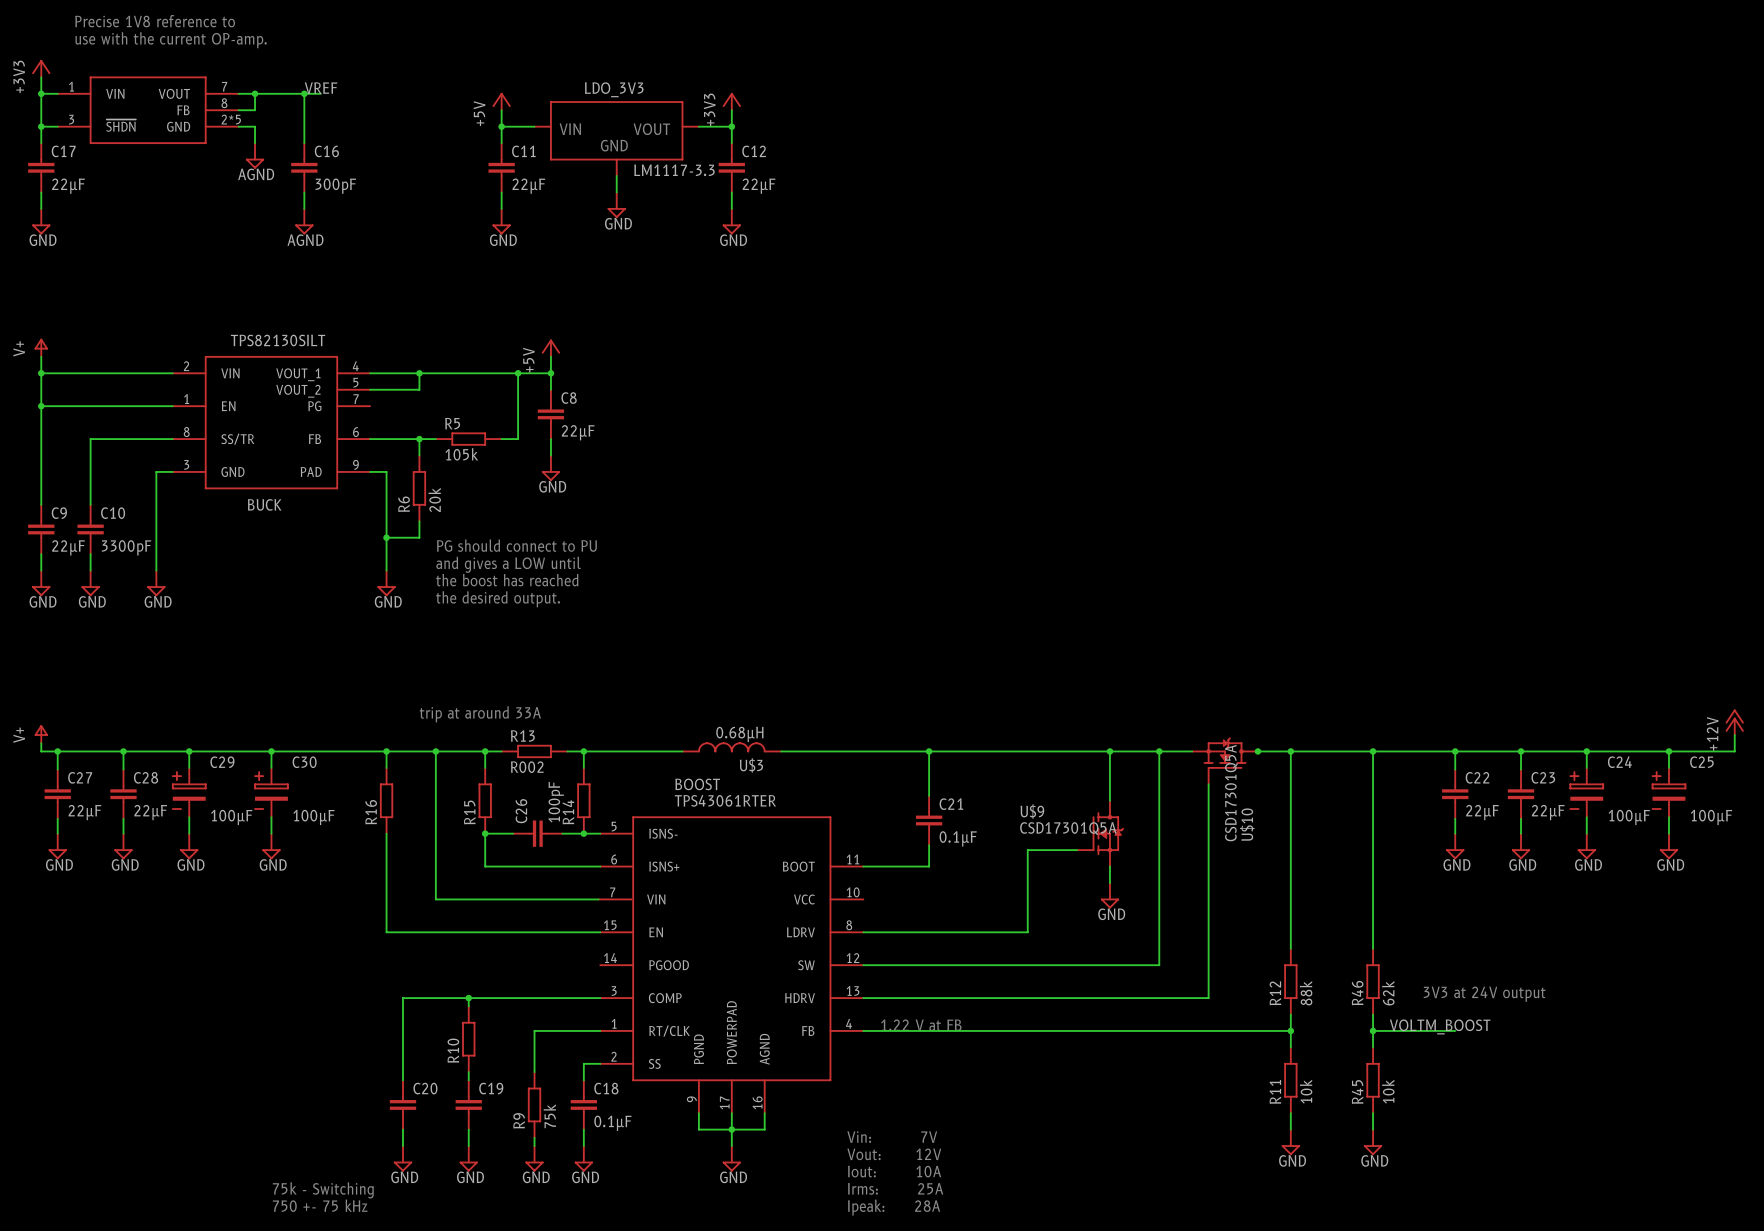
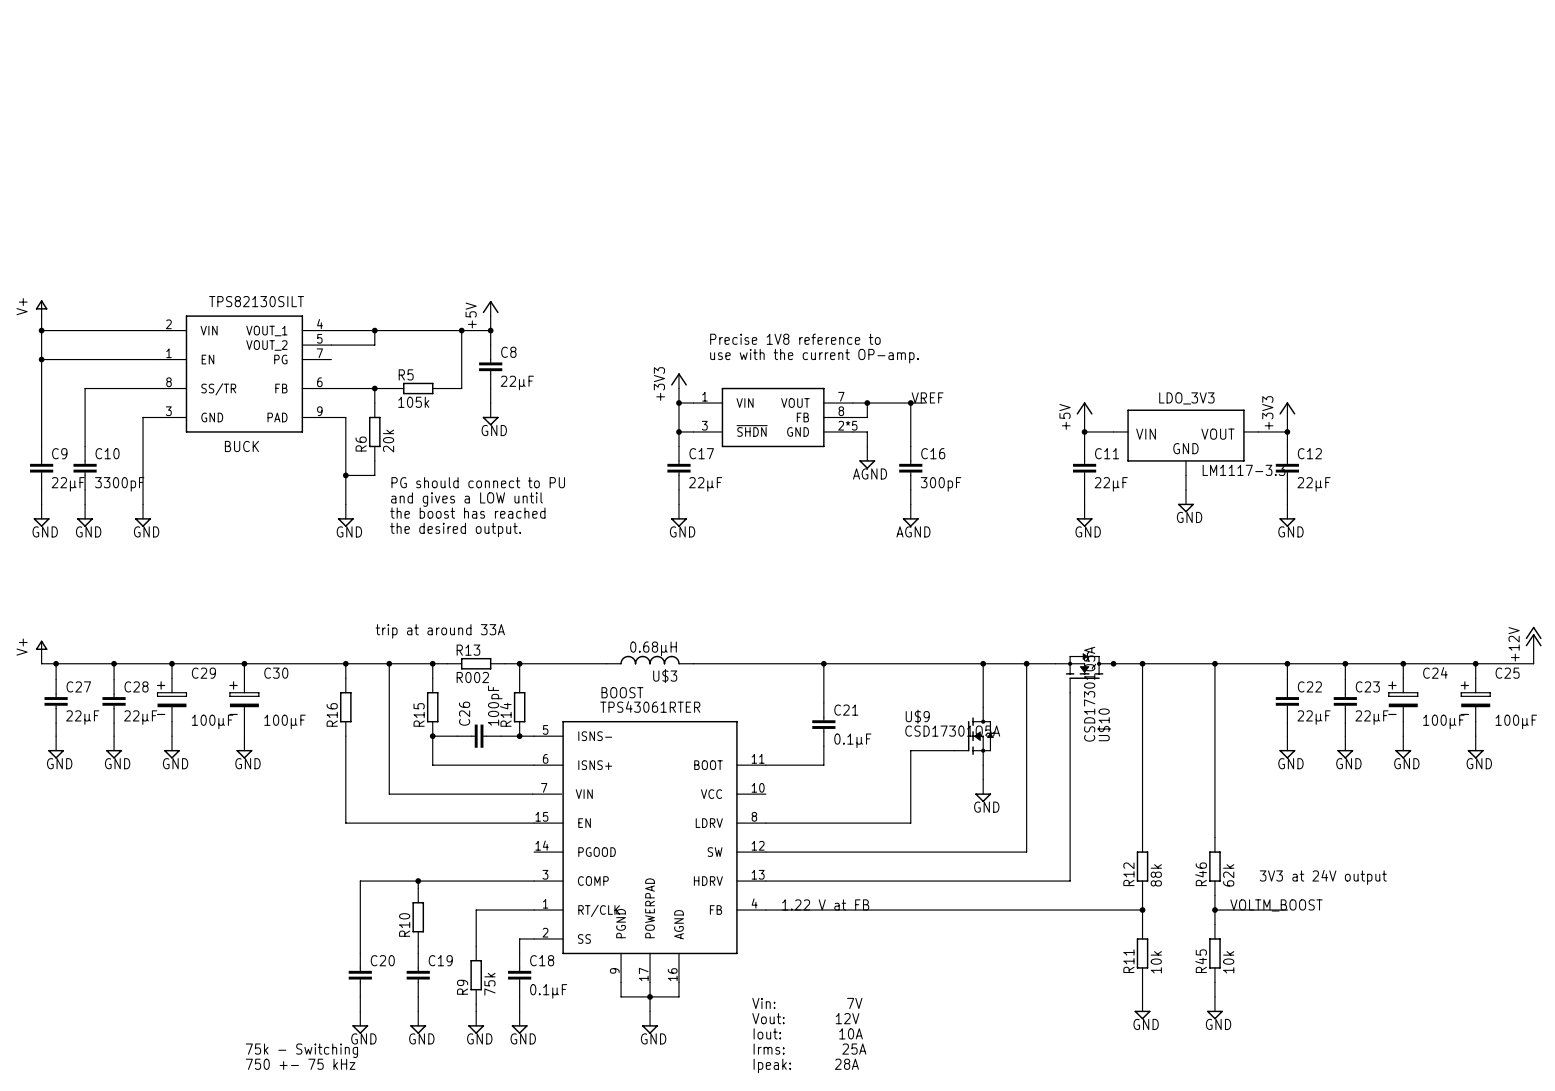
text: Precise 1V8 reference to (155, 21) -> none
text: use with the current OP-amp. (171, 40) -> none
power symbol: +3V3 (41, 68) -> none
wire: (41, 77) (41, 143) -> none
label: VREF (321, 88) -> none
wire: (41, 93) (57, 93) -> none
junction: (41, 93) -> none
wire: (238, 93) (320, 93) -> none
wire: (255, 93) (255, 110) (238, 110) -> none
junction: (255, 93) -> none
wire: (304, 93) (304, 143) -> none
junction: (304, 93) -> none
power symbol: +5V (501, 101) -> none
power symbol: +3V3 (731, 101) -> none
part: (148, 110) -> none
wire: (501, 110) (501, 143) -> none
wire: (731, 110) (731, 143) -> none
wire: (41, 126) (57, 126) -> none
junction: (41, 126) -> none
wire: (238, 126) (255, 126) (255, 143) -> none
wire: (501, 126) (534, 126) -> none
junction: (501, 126) -> none
wire: (698, 126) (731, 126) -> none
junction: (731, 126) -> none
LDO_3V3 position: (616, 138) -> (1185, 442)
power symbol: AGND (255, 155) -> none
C17 position: (41, 167) -> (678, 468)
C16 position: (304, 167) -> (910, 468)
C11 position: (501, 167) -> (1084, 468)
C12 position: (731, 167) -> (1287, 468)
wire: (616, 176) (616, 192) -> none
wire: (41, 192) (41, 208) -> none
wire: (304, 192) (304, 208) -> none
wire: (501, 192) (501, 208) -> none
wire: (731, 192) (731, 208) -> none
power symbol: GND (616, 205) -> none
power symbol: GND (41, 221) -> none
power symbol: AGND (304, 221) -> none
power symbol: GND (501, 221) -> none
power symbol: GND (731, 221) -> none
text: none -> Precise 1V8 reference to (795, 339)
text: none -> use with the current OP-amp. (814, 356)
power symbol: none -> +3V3 (678, 380)
wire: none -> (678, 388) (678, 446)
label: none -> VREF (927, 397)
wire: none -> (678, 403) (693, 403)
junction: none -> (678, 403)
wire: none -> (852, 403) (925, 403)
wire: none -> (867, 403) (867, 417) (852, 417)
junction: none -> (867, 403)
wire: none -> (910, 403) (910, 446)
junction: none -> (910, 403)
power symbol: none -> +5V (1084, 409)
power symbol: none -> +3V3 (1287, 409)
part: none -> (773, 417)
wire: none -> (1084, 417) (1084, 446)
wire: none -> (1287, 417) (1287, 446)
wire: none -> (678, 431) (693, 431)
junction: none -> (678, 431)
wire: none -> (852, 431) (867, 431) (867, 446)
wire: none -> (1084, 431) (1113, 431)
junction: none -> (1084, 431)
wire: none -> (1258, 431) (1287, 431)
junction: none -> (1287, 431)
power symbol: none -> AGND (867, 457)
wire: none -> (1185, 475) (1185, 489)
wire: none -> (678, 489) (678, 504)
wire: none -> (910, 489) (910, 504)
wire: none -> (1084, 489) (1084, 504)
wire: none -> (1287, 489) (1287, 504)
power symbol: none -> GND (1185, 501)
power symbol: none -> GND (678, 515)
power symbol: none -> AGND (910, 515)
power symbol: none -> GND (1084, 515)
power symbol: none -> GND (1287, 515)

